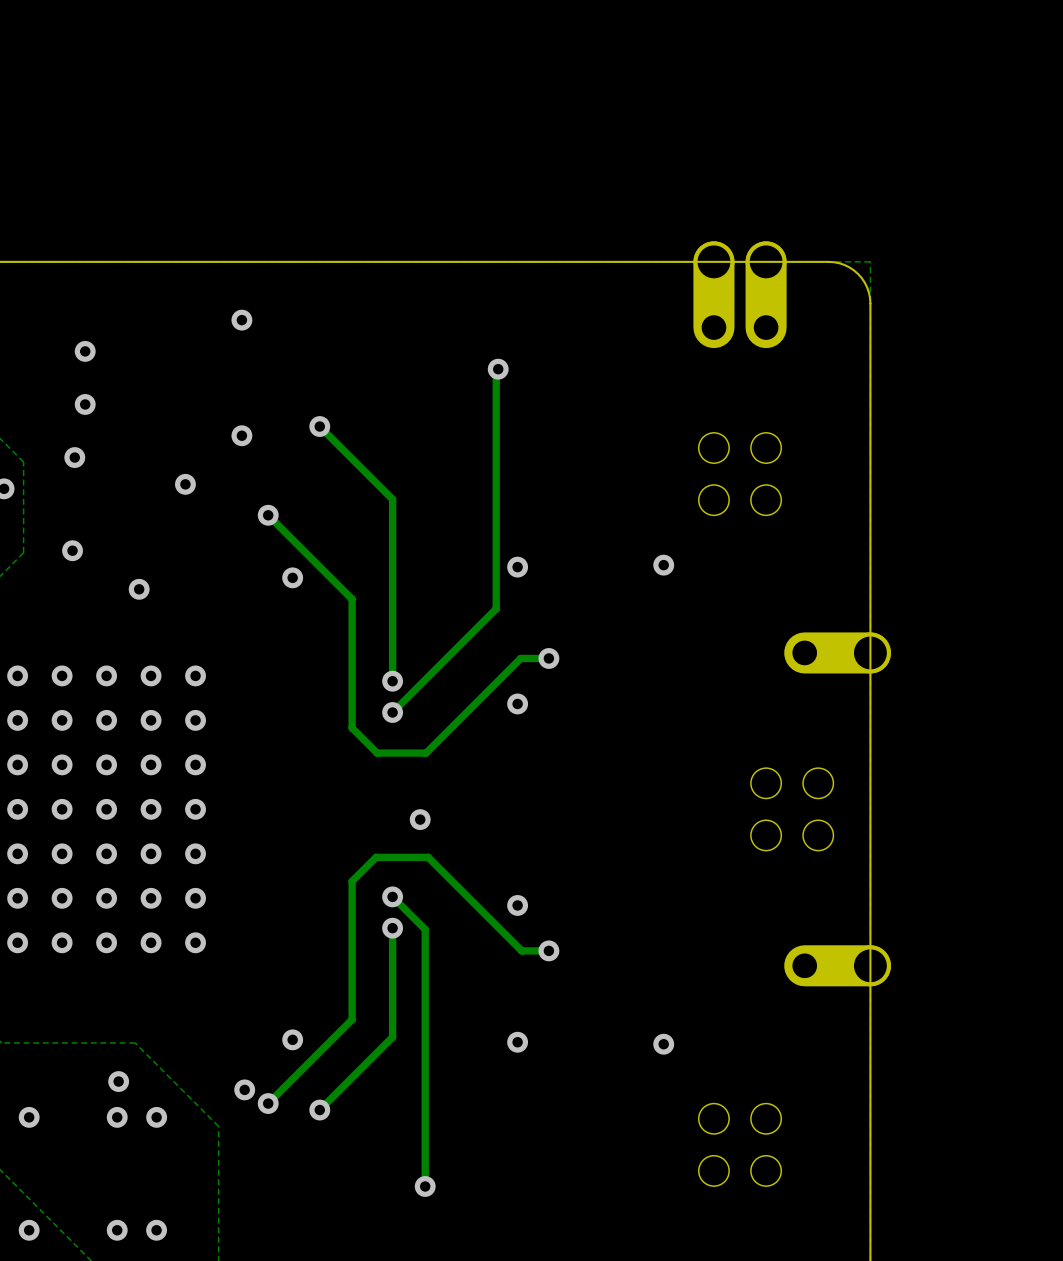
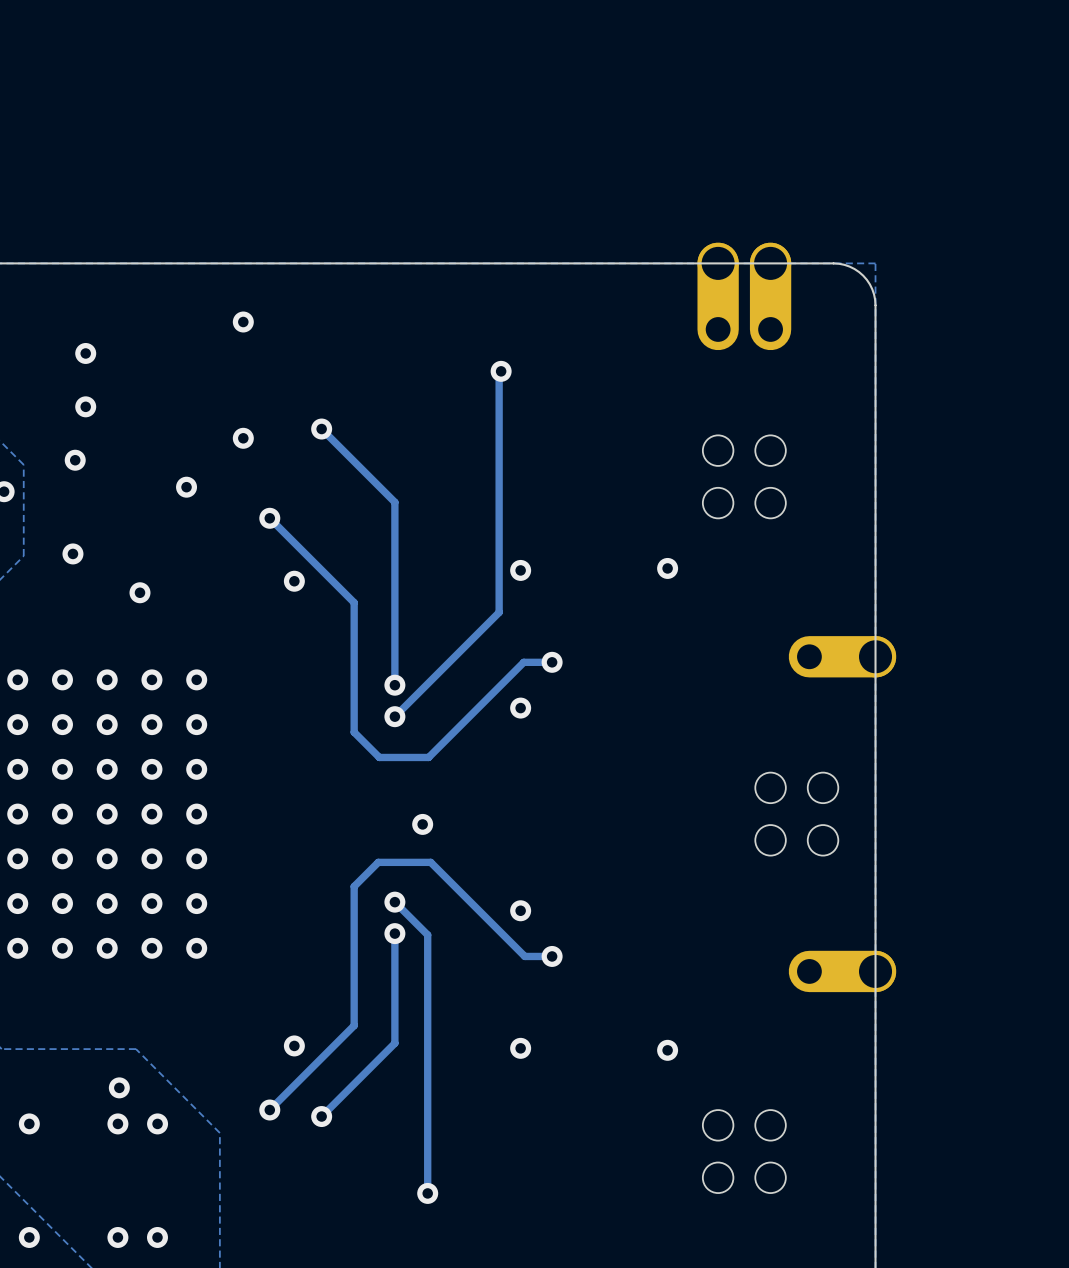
via: (244, 1089) -> none

